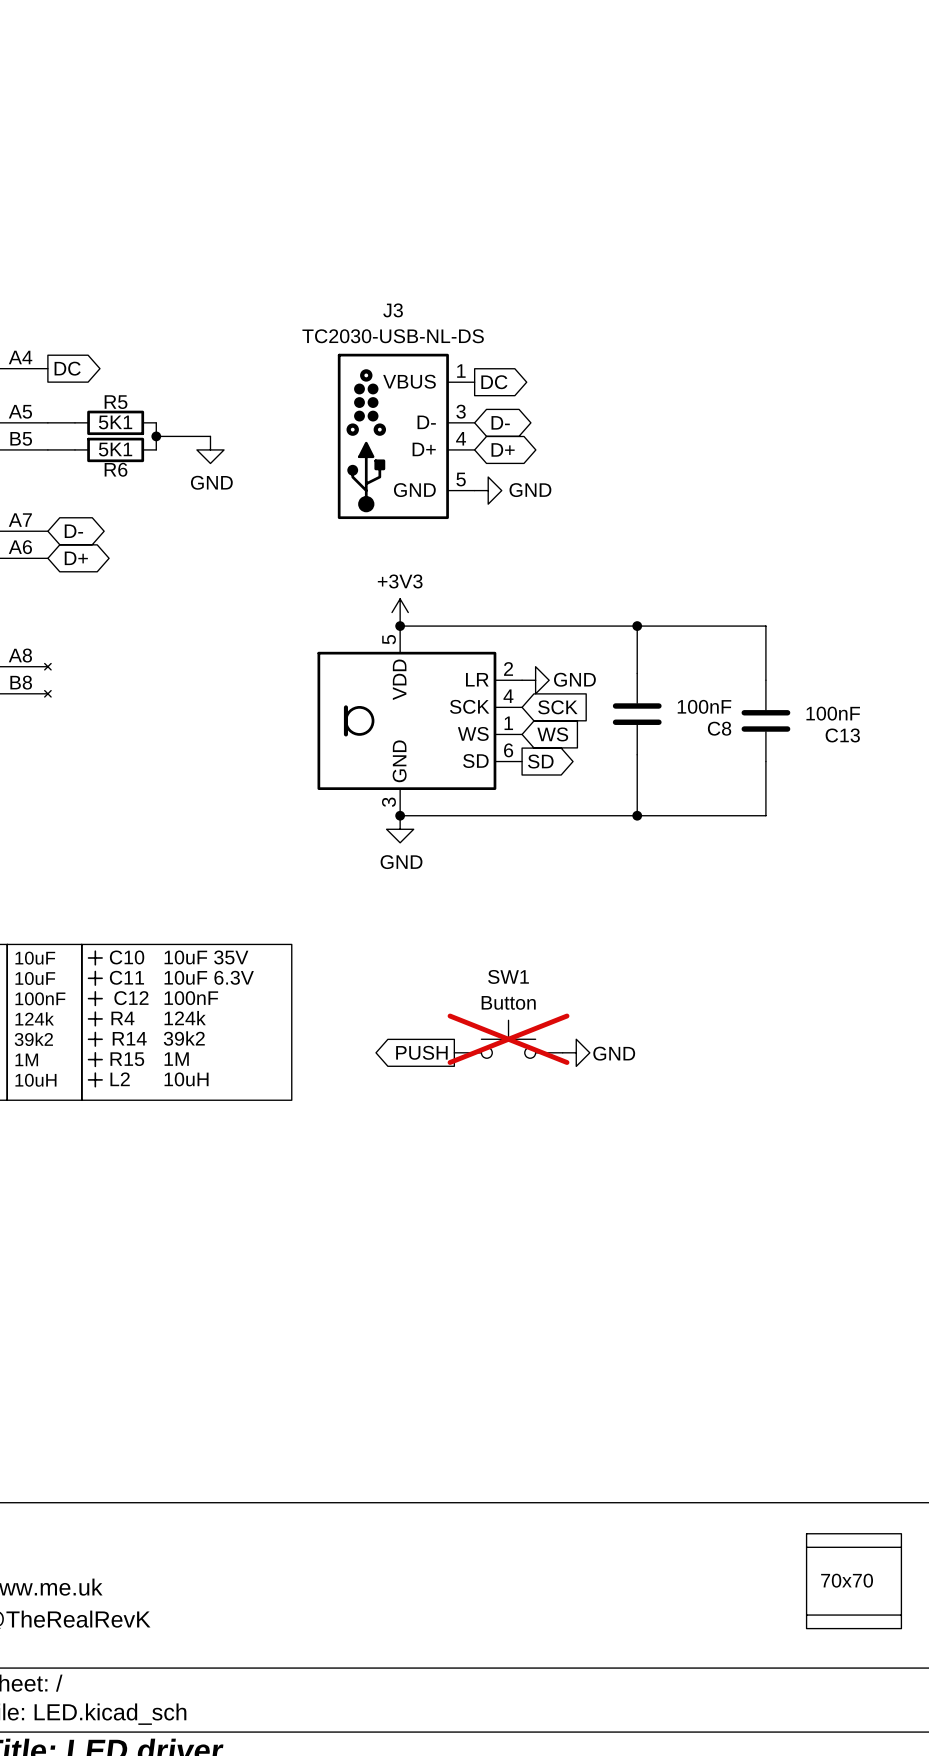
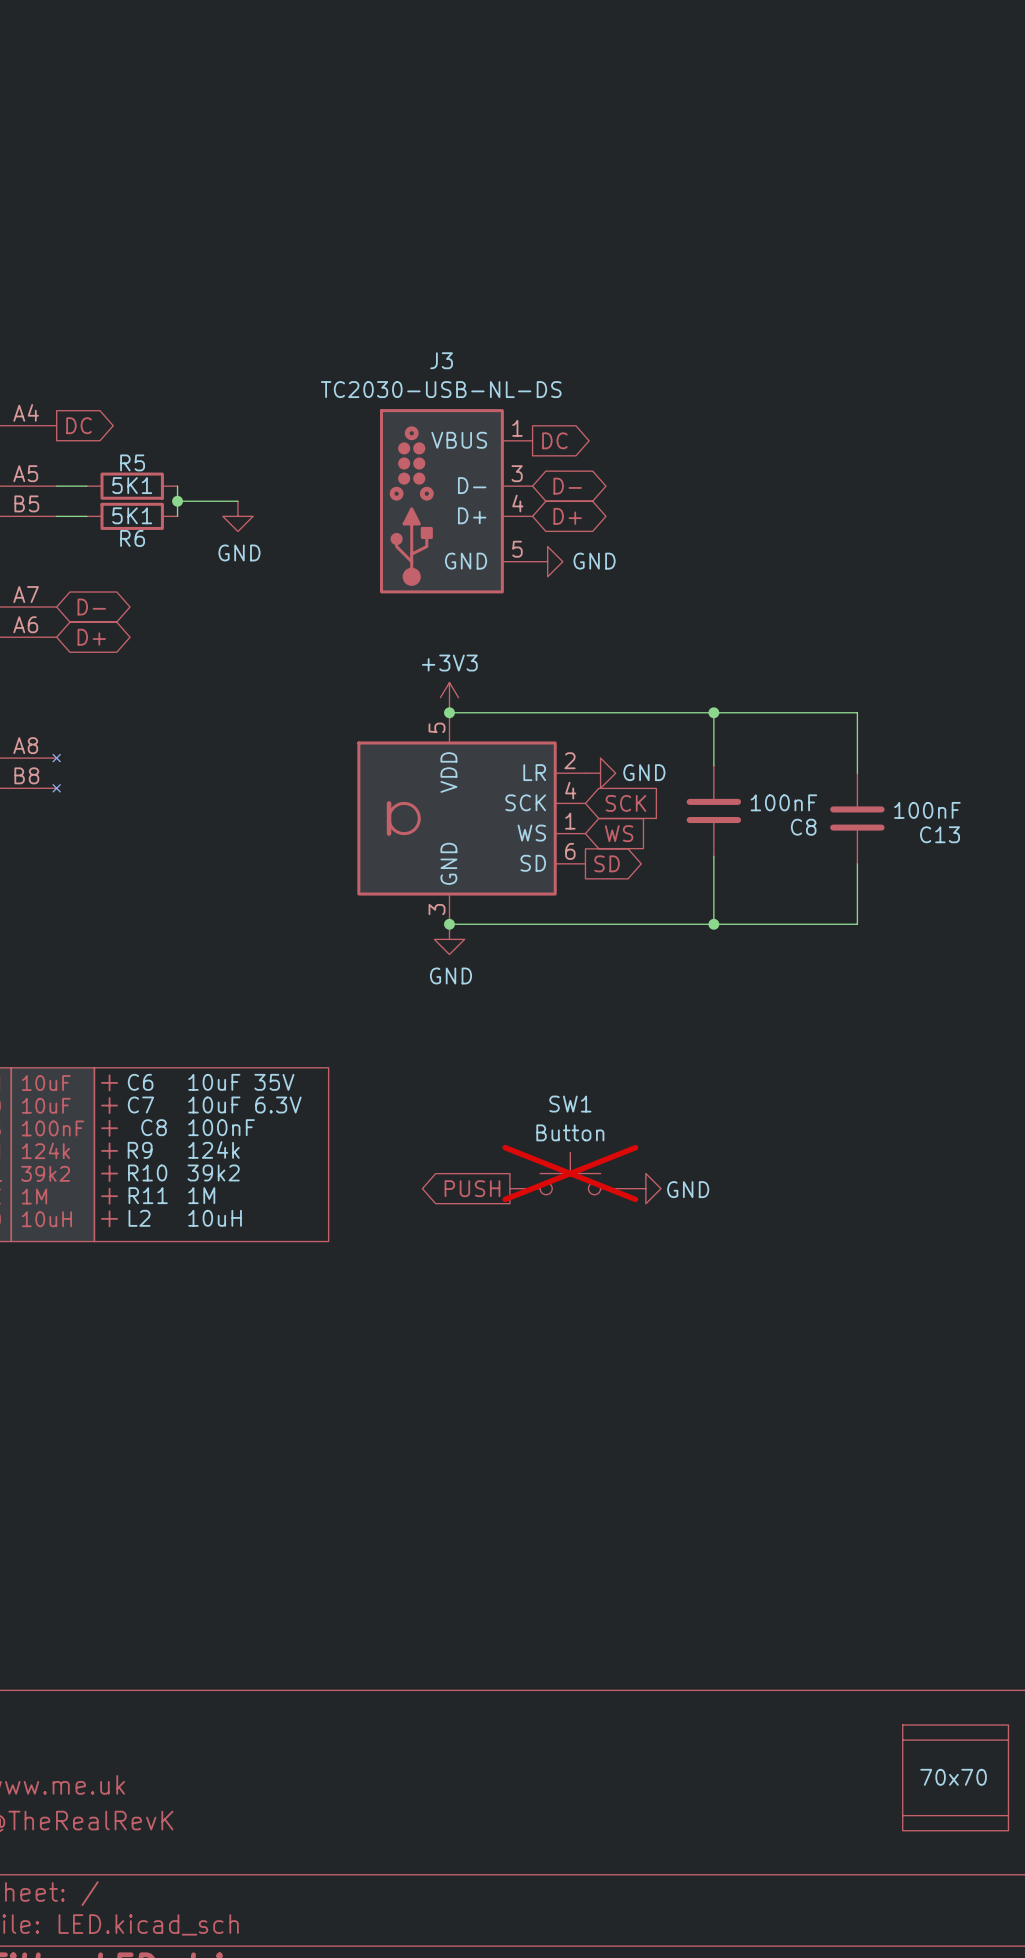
C10 name: C10 (127, 957) -> C6 (140, 1082)
C11 name: C11 (126, 977) -> C7 (140, 1105)
C12 name: C12 (131, 998) -> C8 (154, 1127)
R4 name: R4 (122, 1018) -> R9 (140, 1150)
R14 name: R14 (129, 1038) -> R10 (147, 1172)
R15 name: R15 (127, 1059) -> R11 (148, 1195)

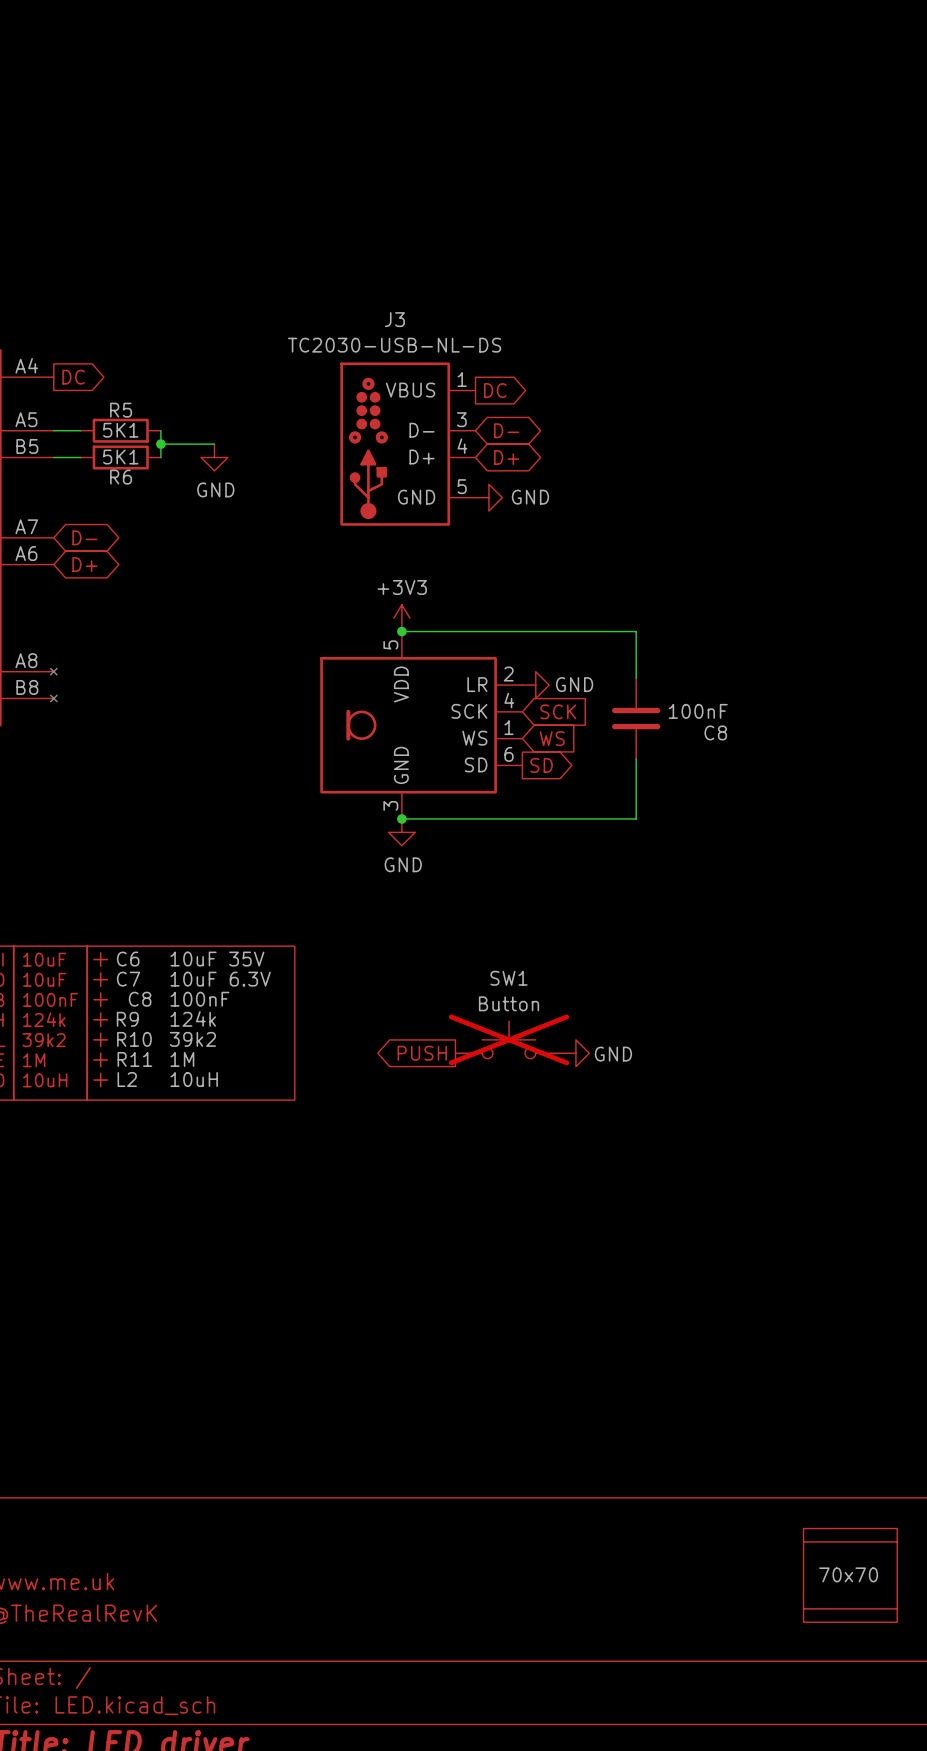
wire: (713, 712) (857, 712) (857, 773) -> none
junction: (713, 712) -> none
C13: 100nF (857, 818) -> none
wire: (857, 863) (857, 924) (713, 924) -> none
junction: (713, 924) -> none

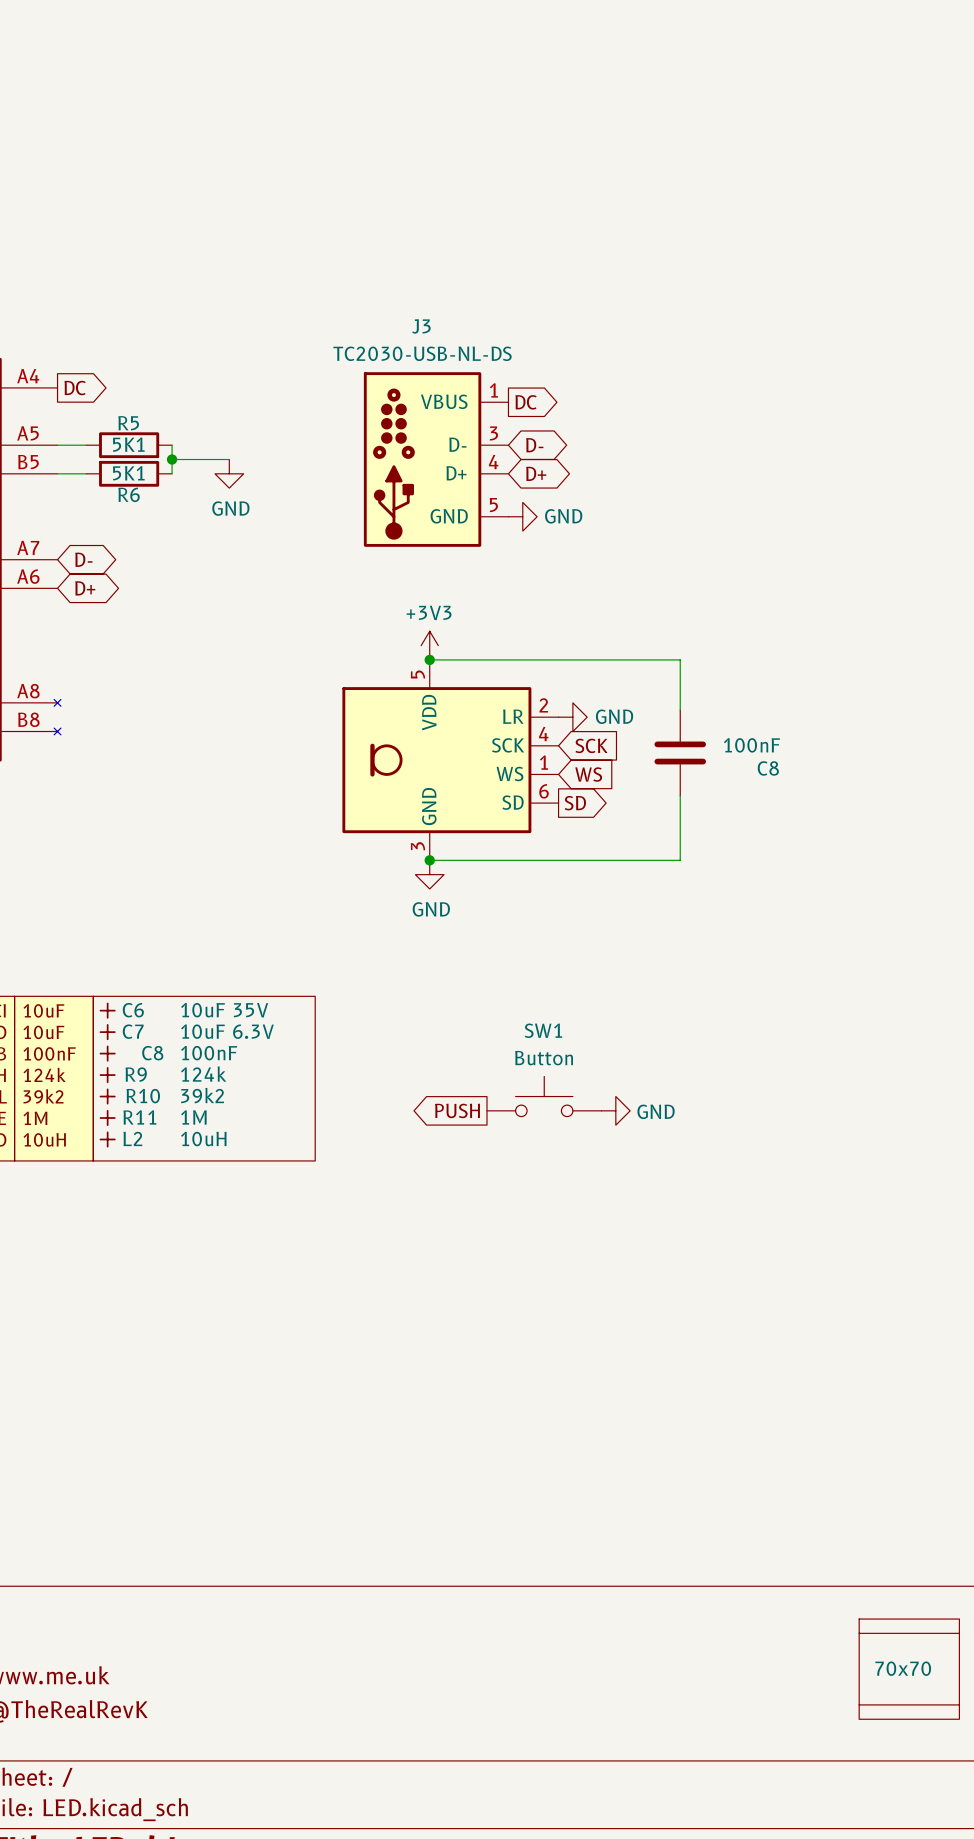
SW1 do-not-place cross: (509, 1039) -> none

